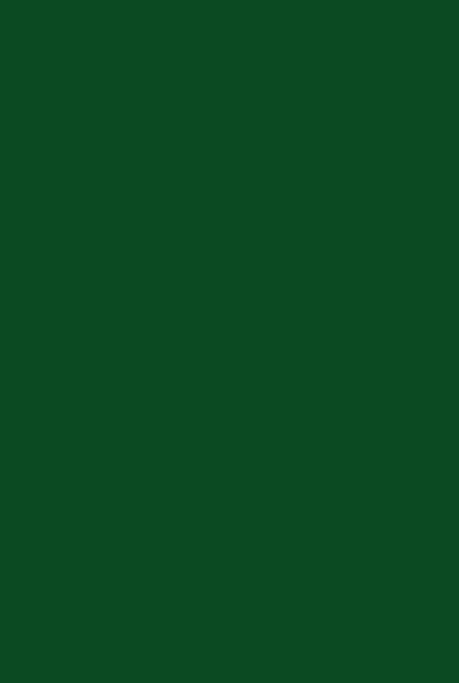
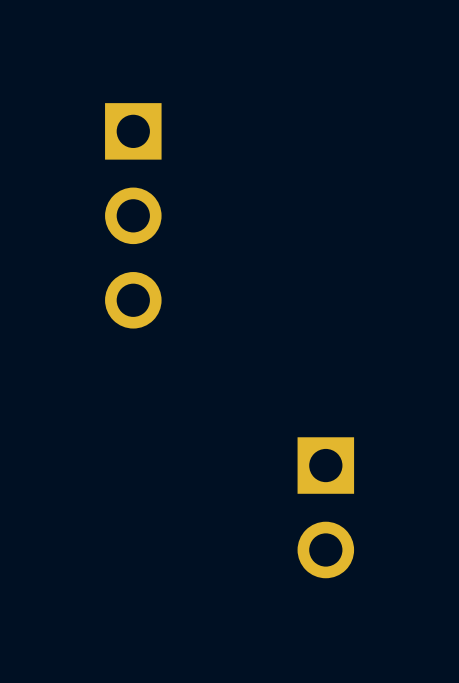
part: none -> (133, 215)
part: none -> (325, 507)

